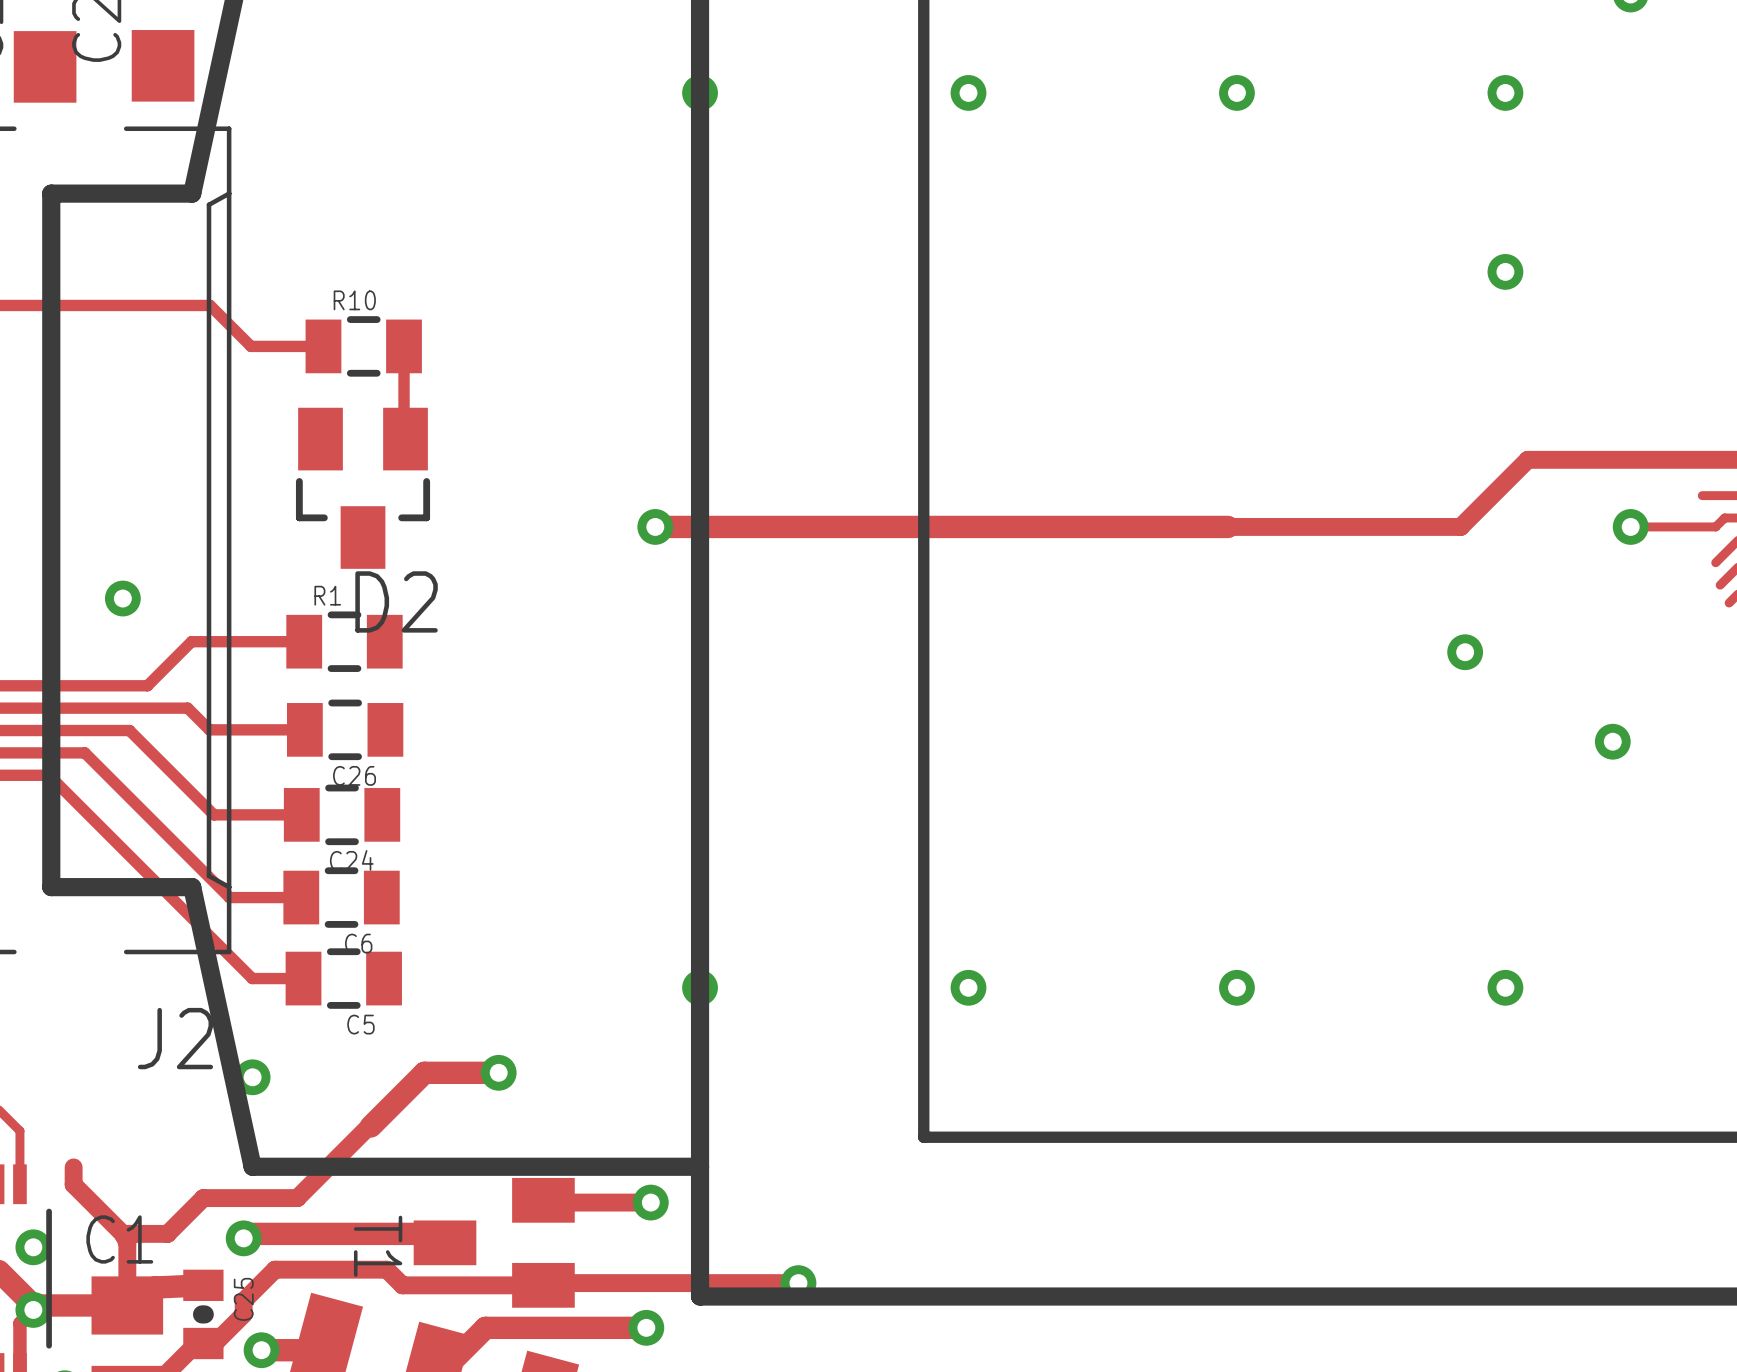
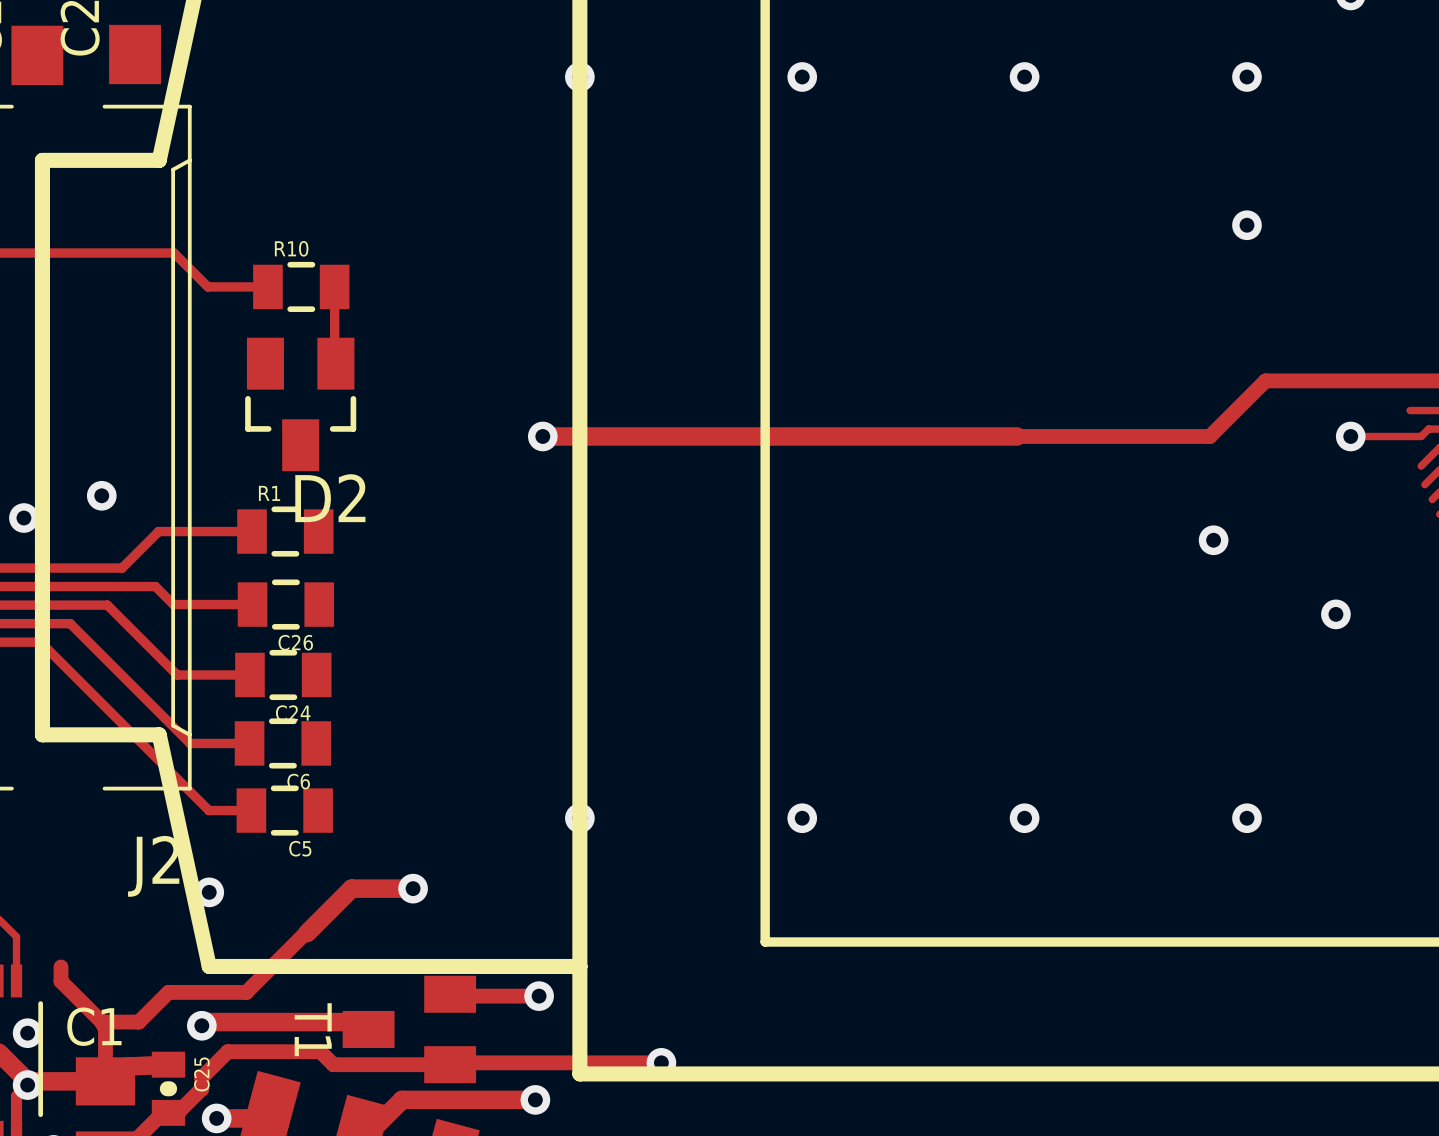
via: none -> (23, 518)

